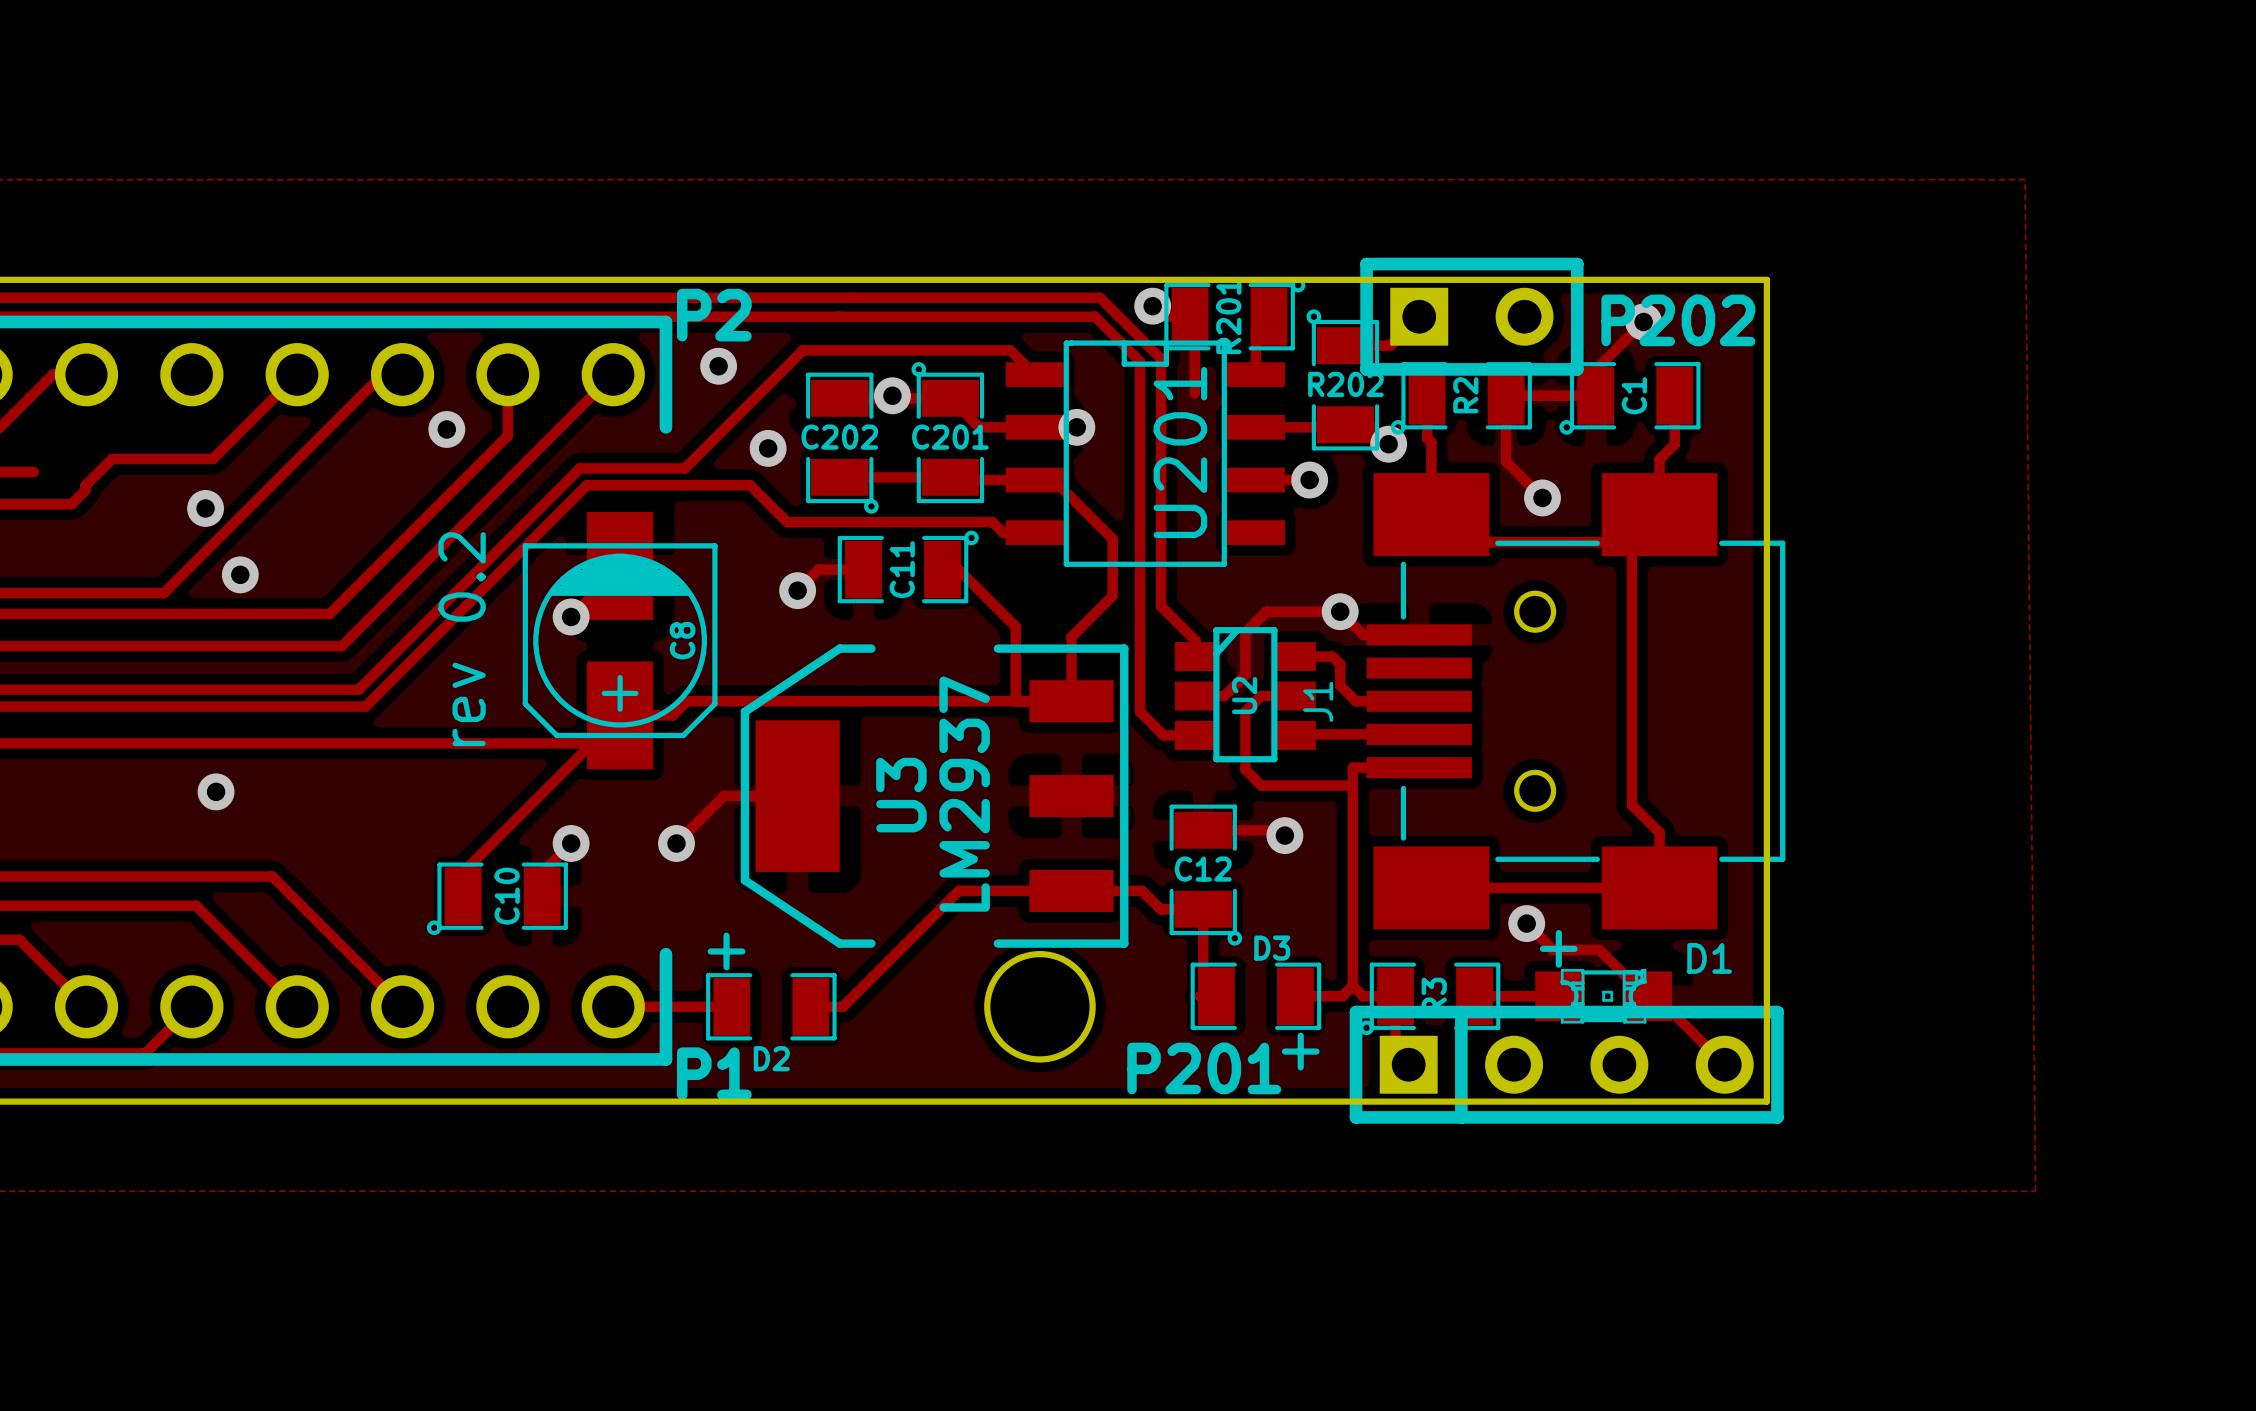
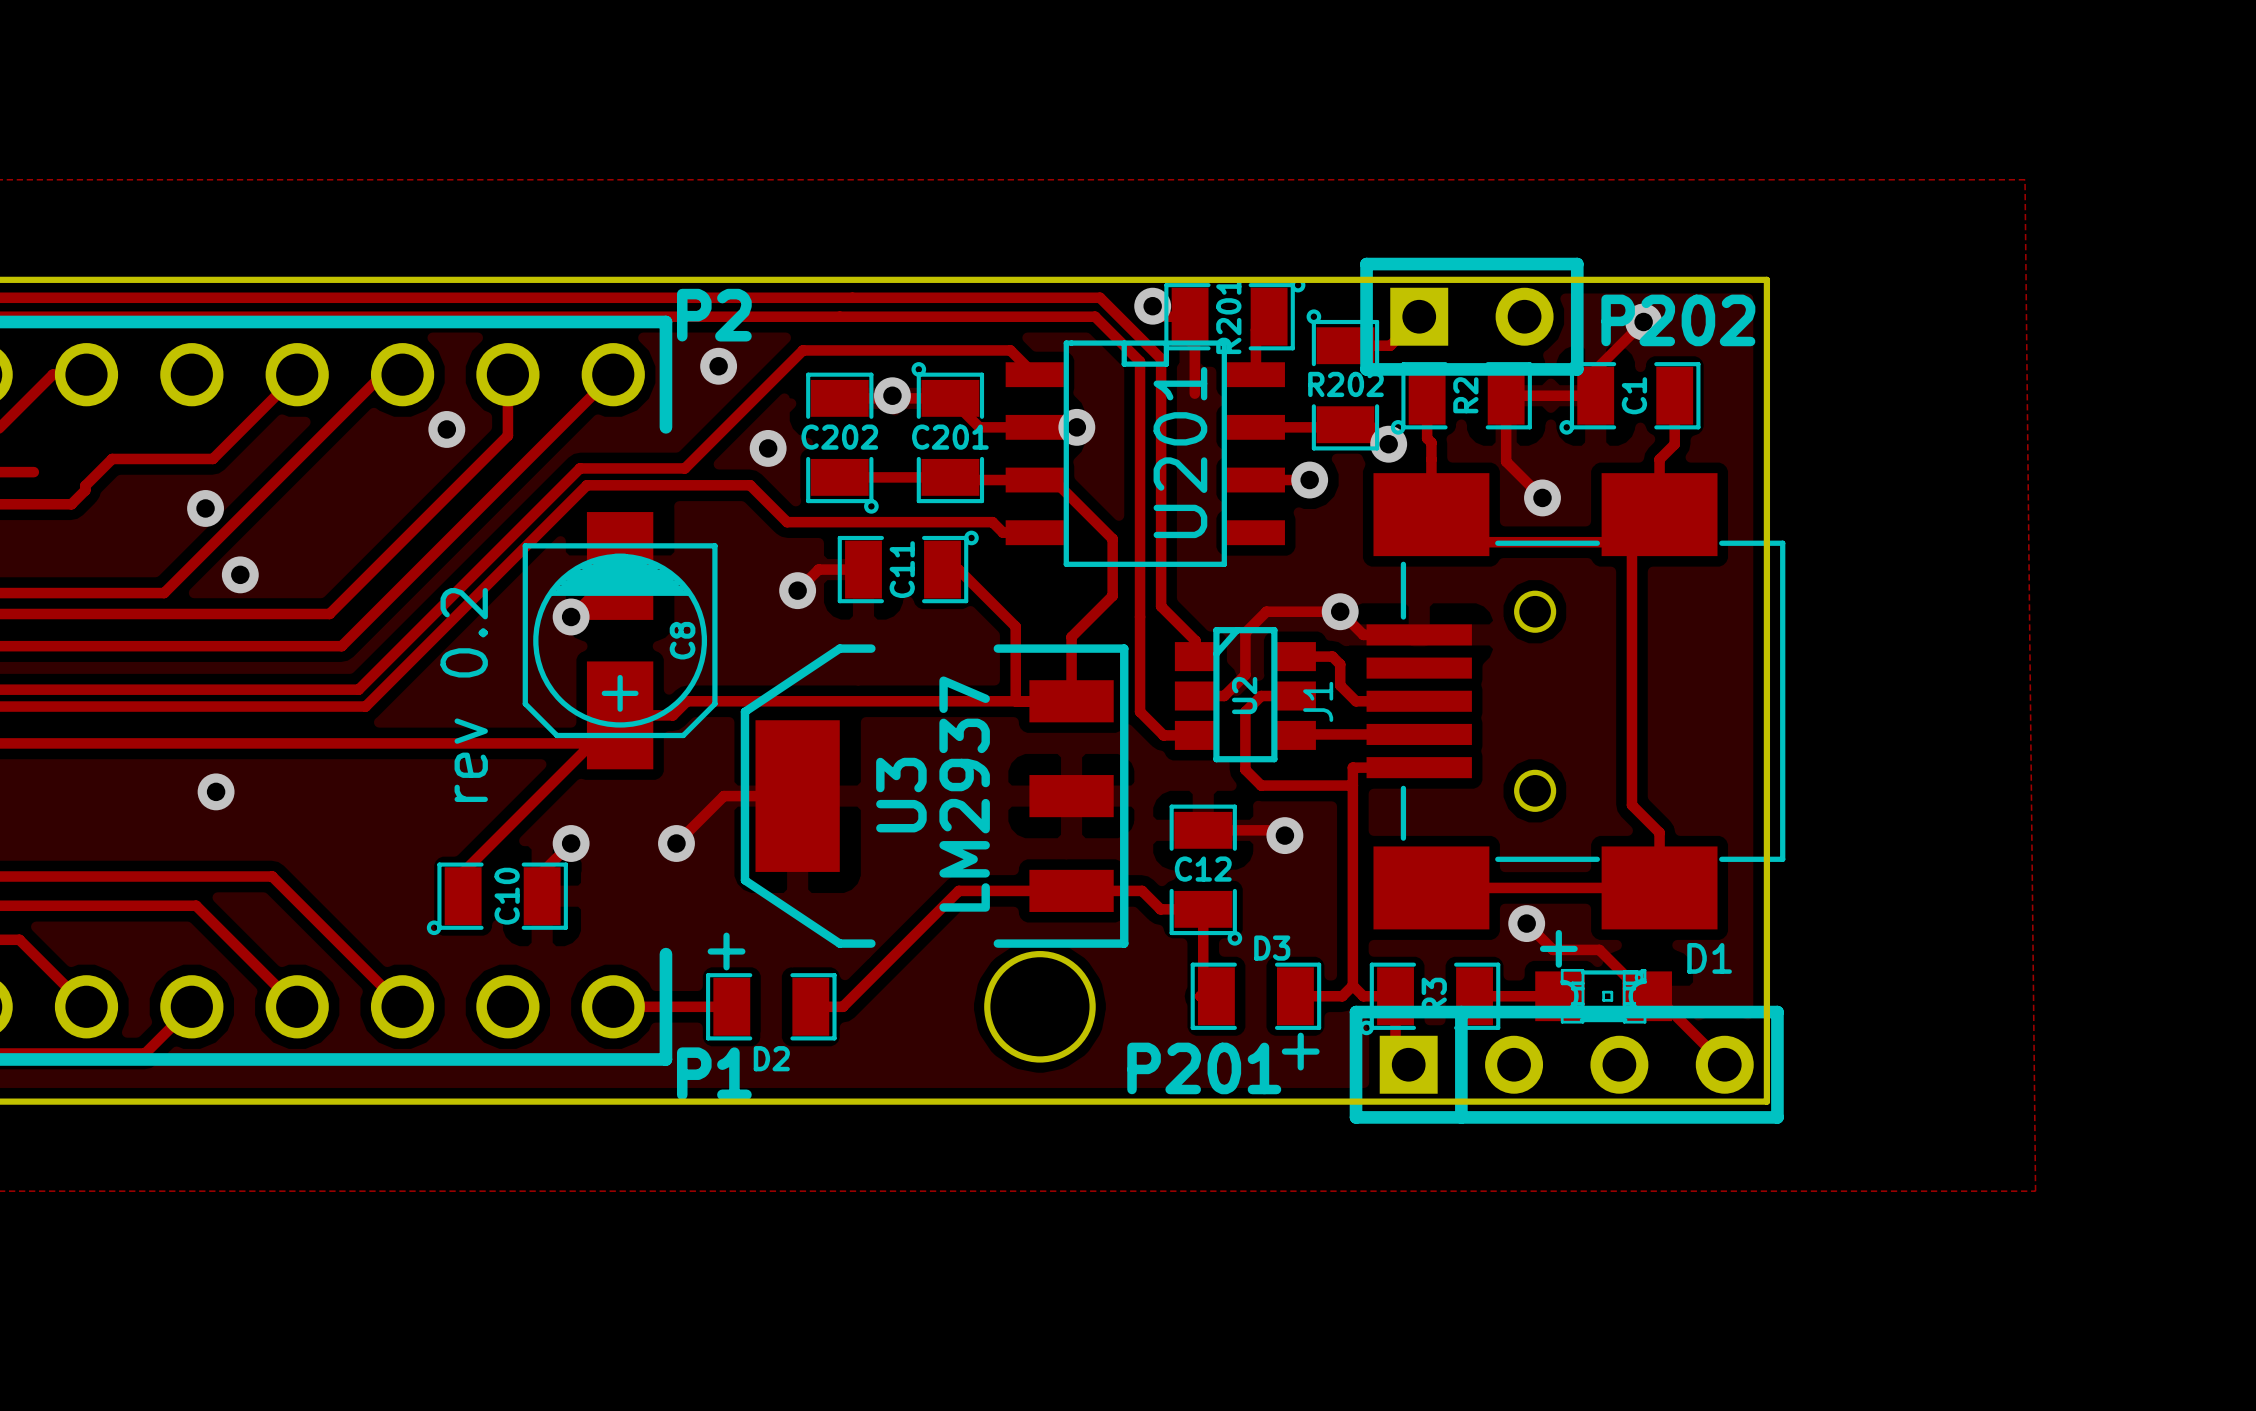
text position: rev 0.2 (462, 639) -> rev 0.2 (464, 695)

